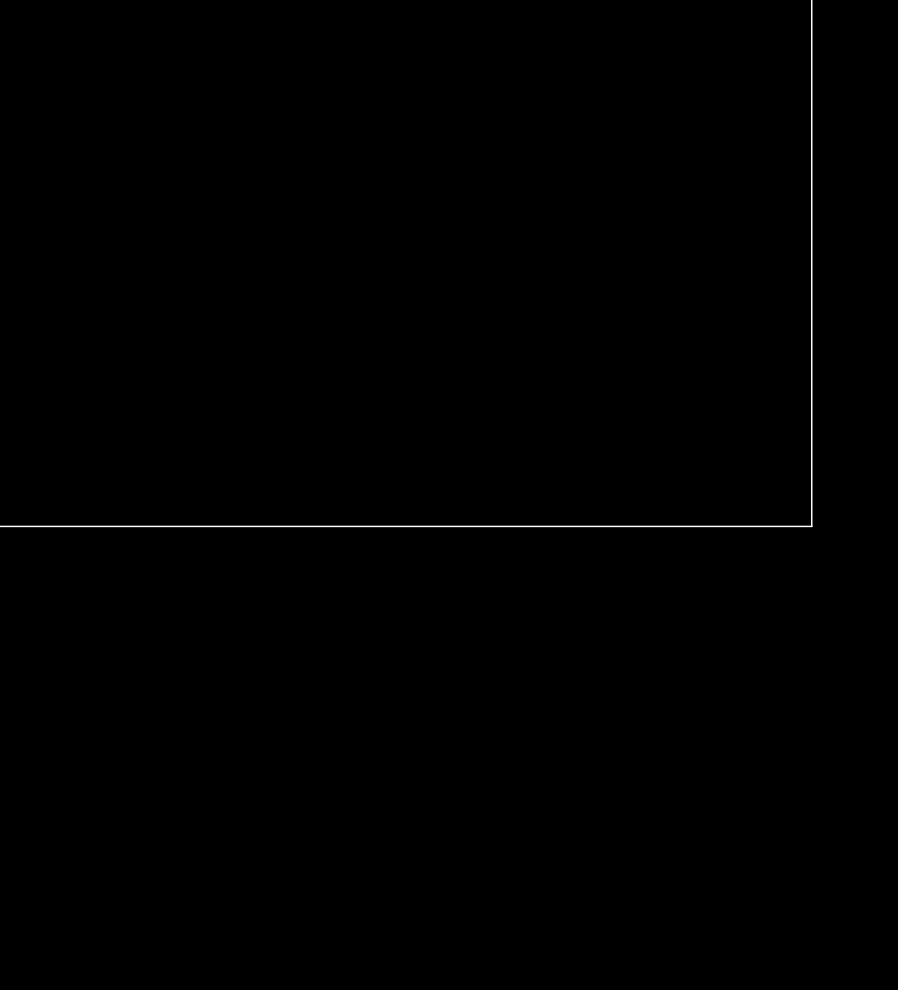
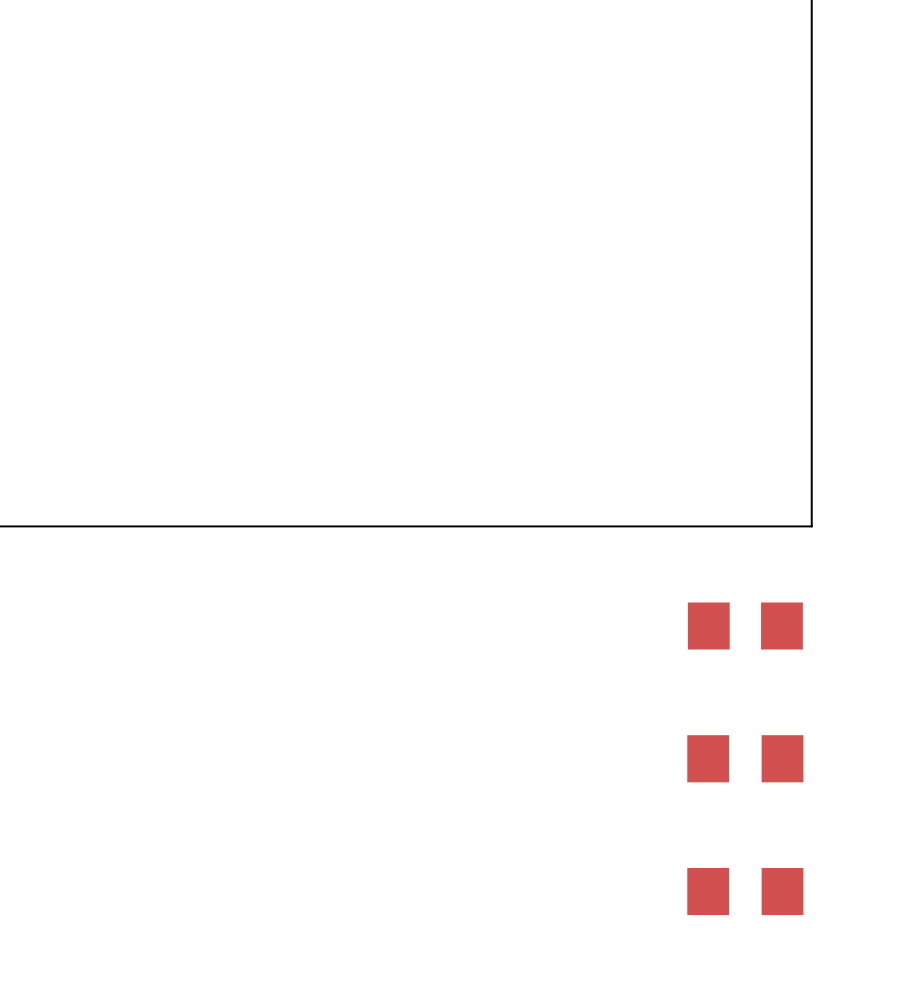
part: none -> (745, 625)
part: none -> (745, 758)
part: none -> (745, 891)

